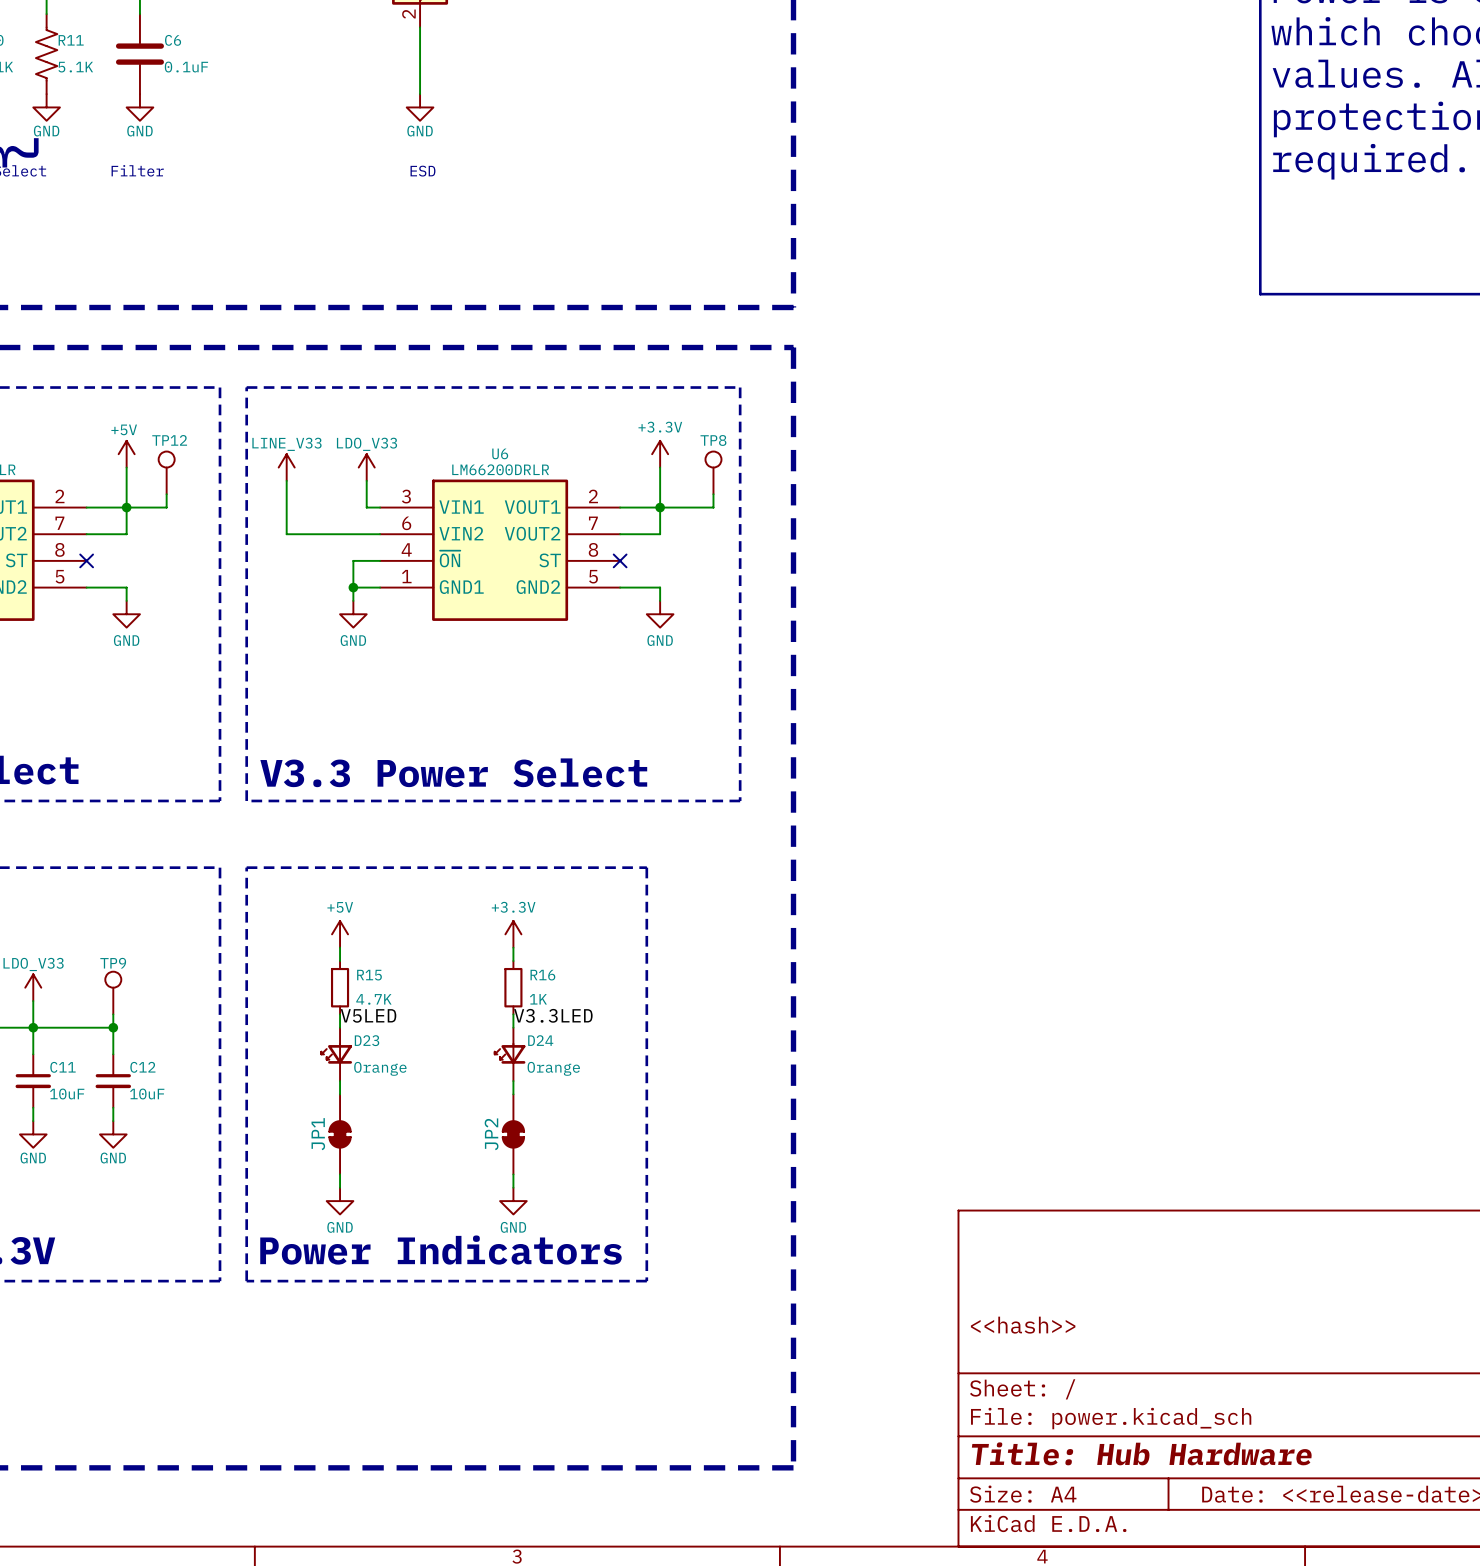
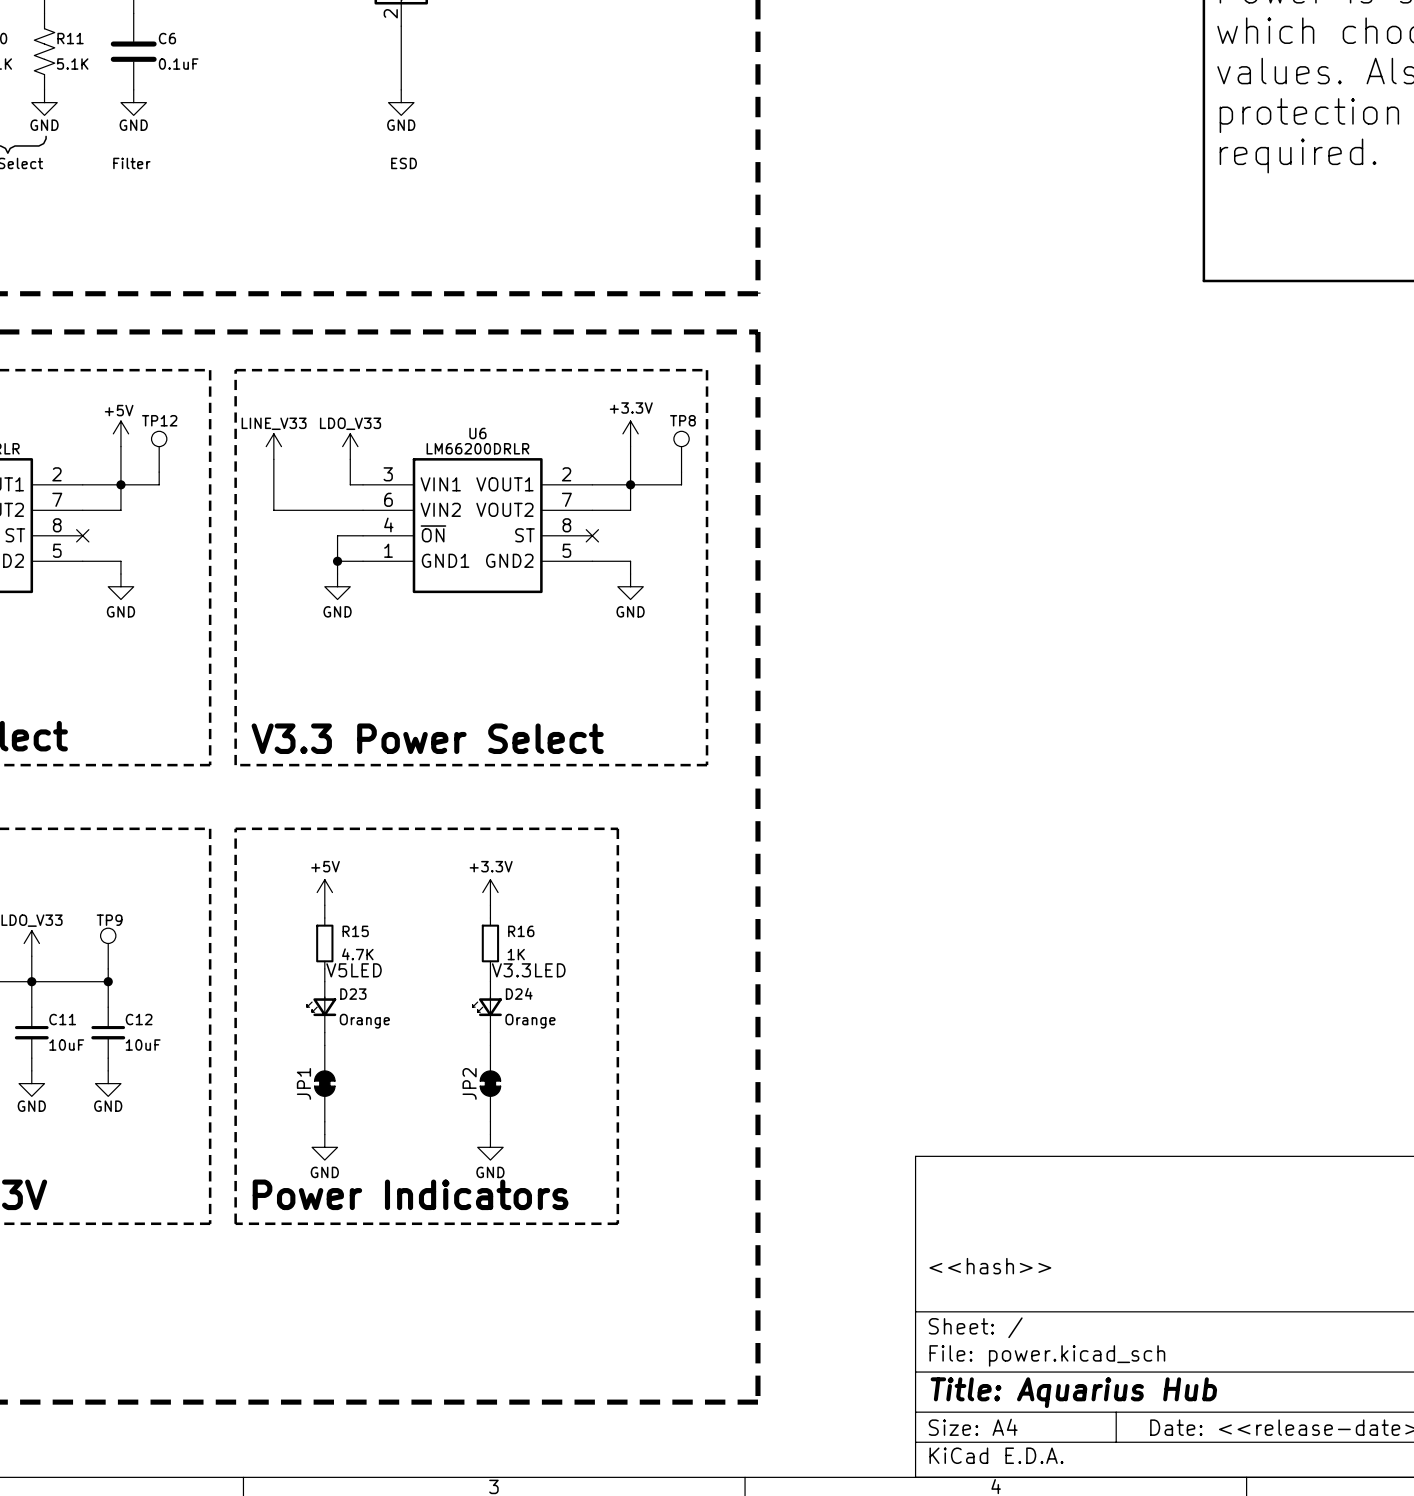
title block: Title: Hub Hardware (1141, 1453) -> Title: Aquarius Hub (1073, 1392)

